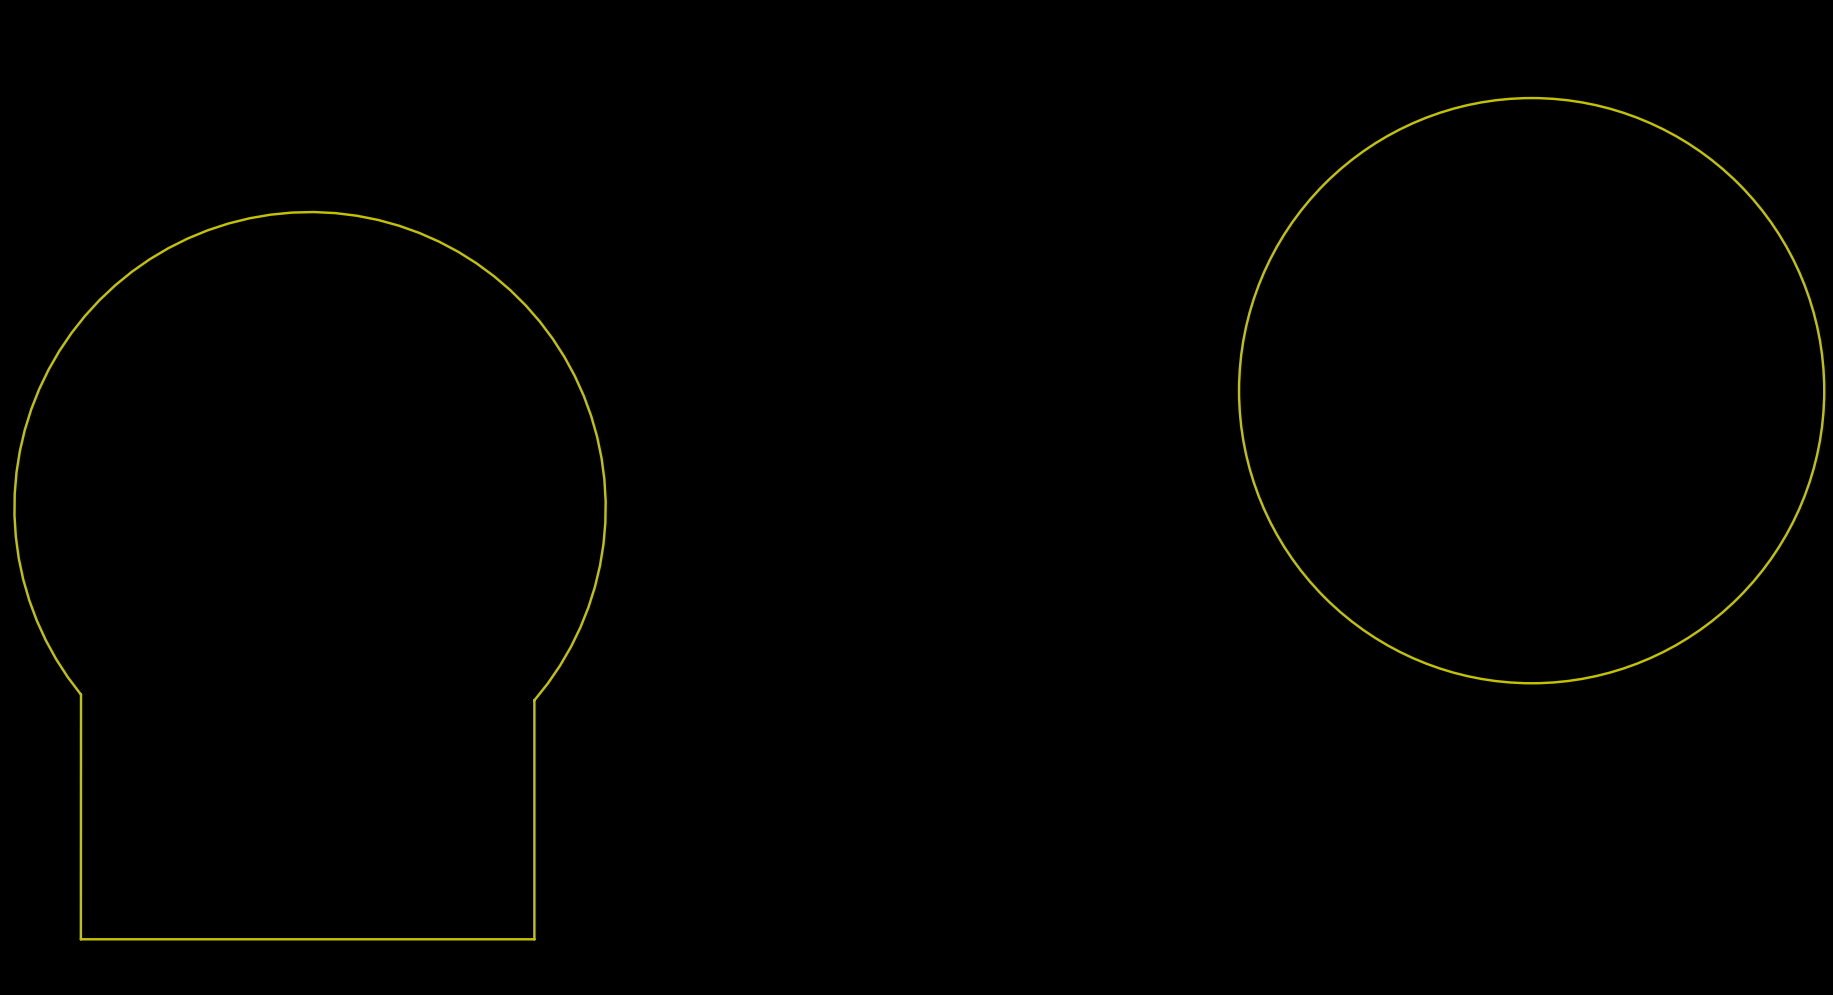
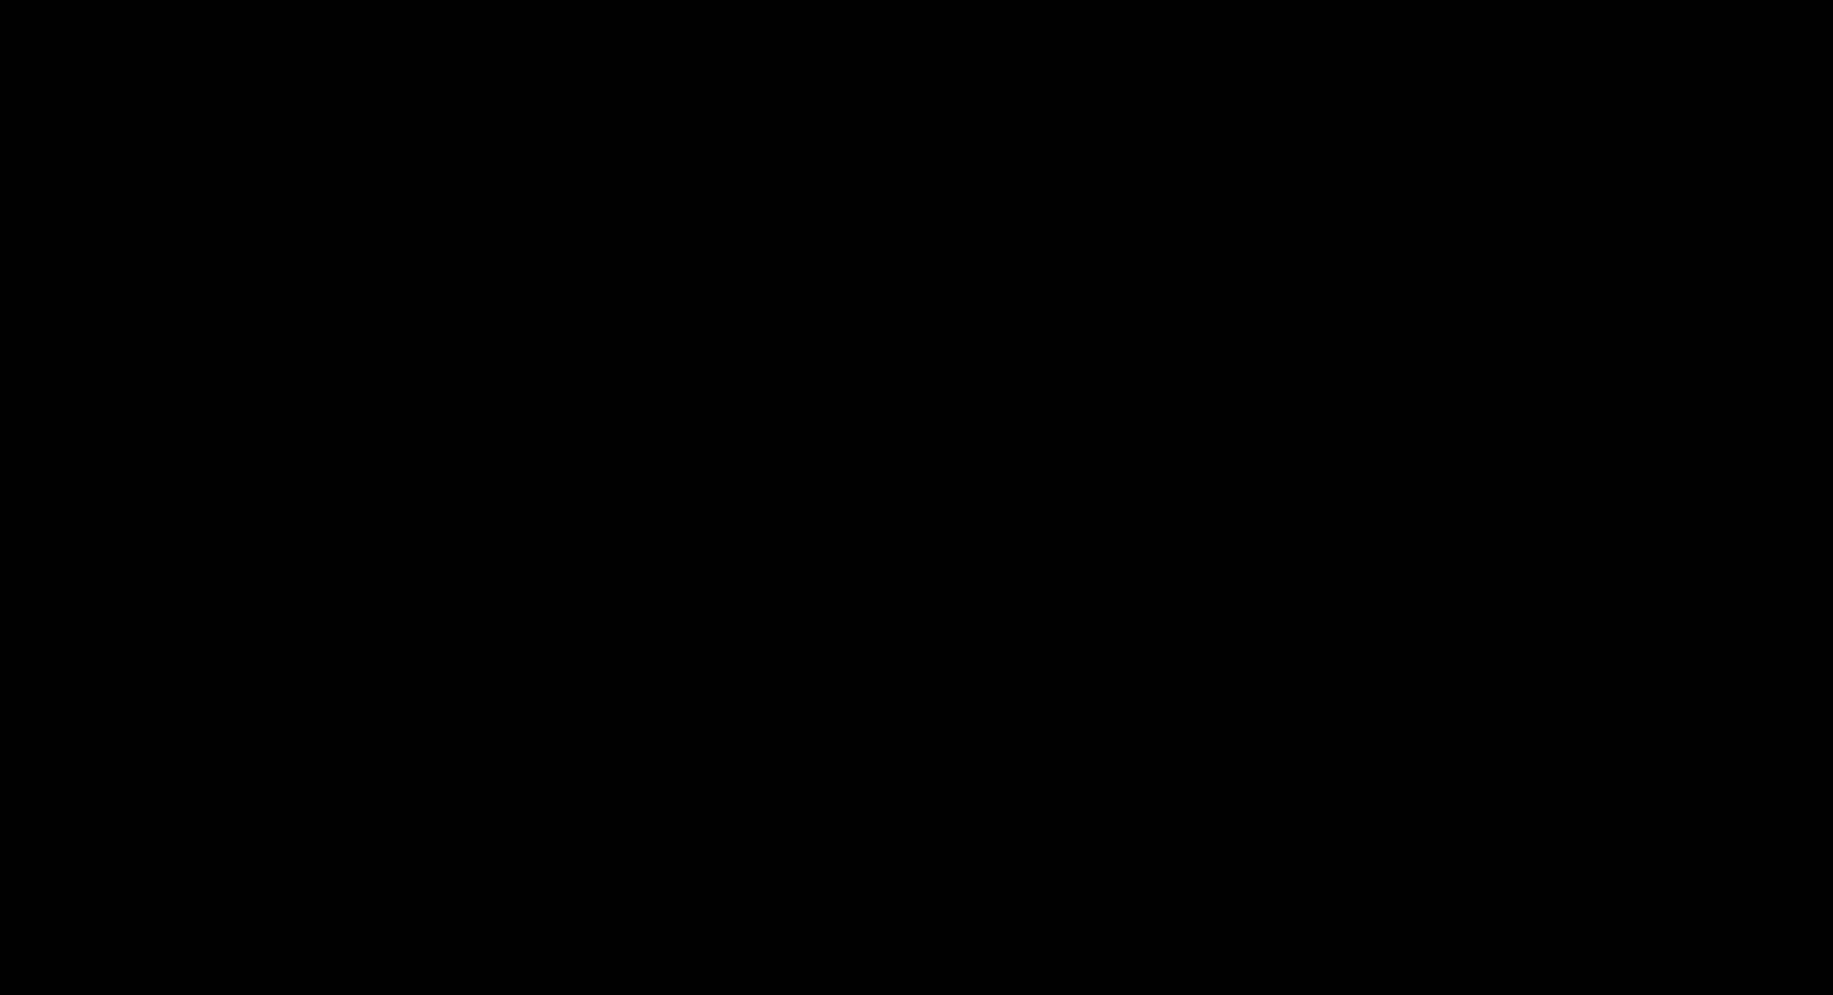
round board edge: [1237, 96, 1826, 685] -> none
board edge: (81, 694) (80, 939) (534, 939) (534, 700) (547, 683) (570, 646) (588, 607) (599, 565) (603, 544) (605, 501) (601, 458) (591, 416) (583, 395) (564, 357) (539, 321) (510, 290) (493, 276) (476, 263) (439, 241) (419, 232) (378, 219) (335, 213) (292, 212) (249, 218) (228, 223) (187, 238) (168, 248) (149, 259) (115, 285) (84, 316) (59, 350) (48, 369) (31, 409) (24, 429) (16, 472) (14, 493) (15, 537) (18, 558) (29, 600) (45, 640) (56, 659) (81, 694) -> none

